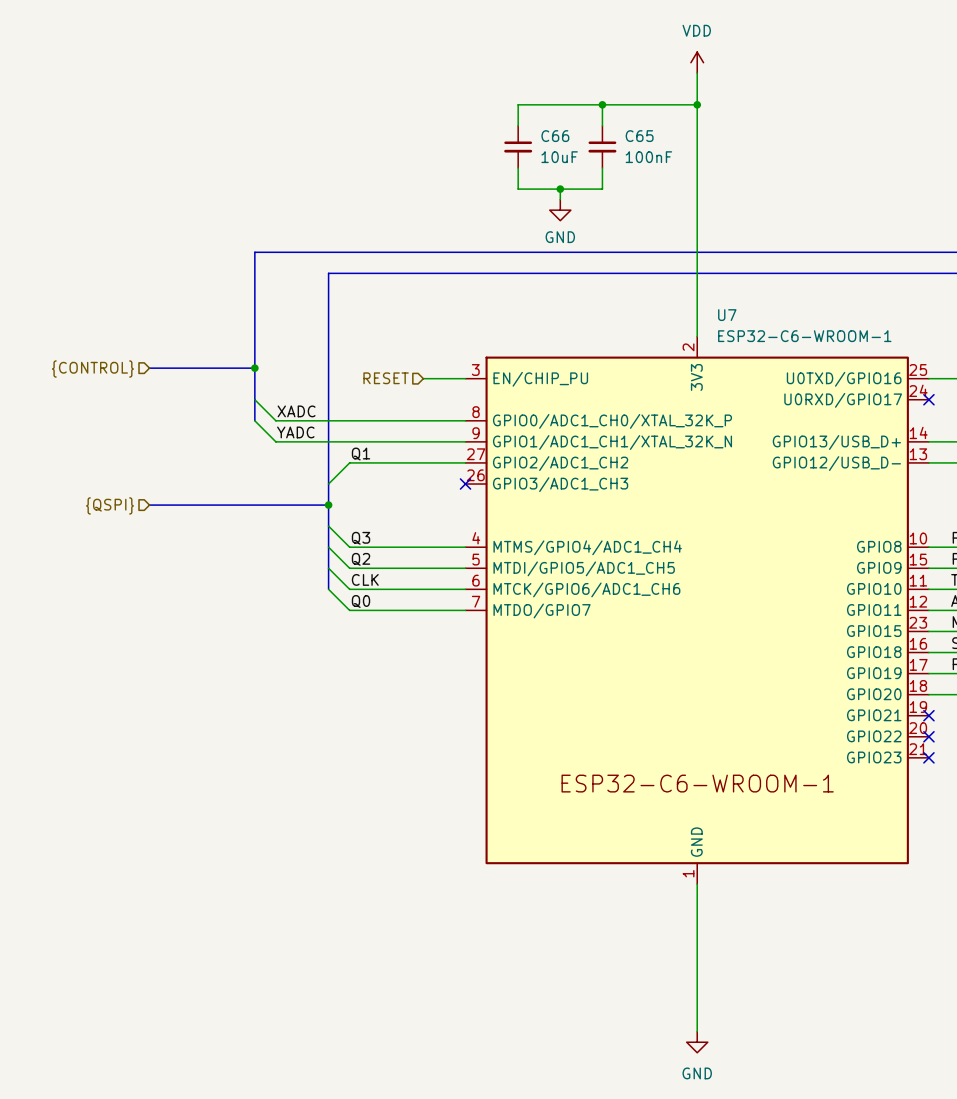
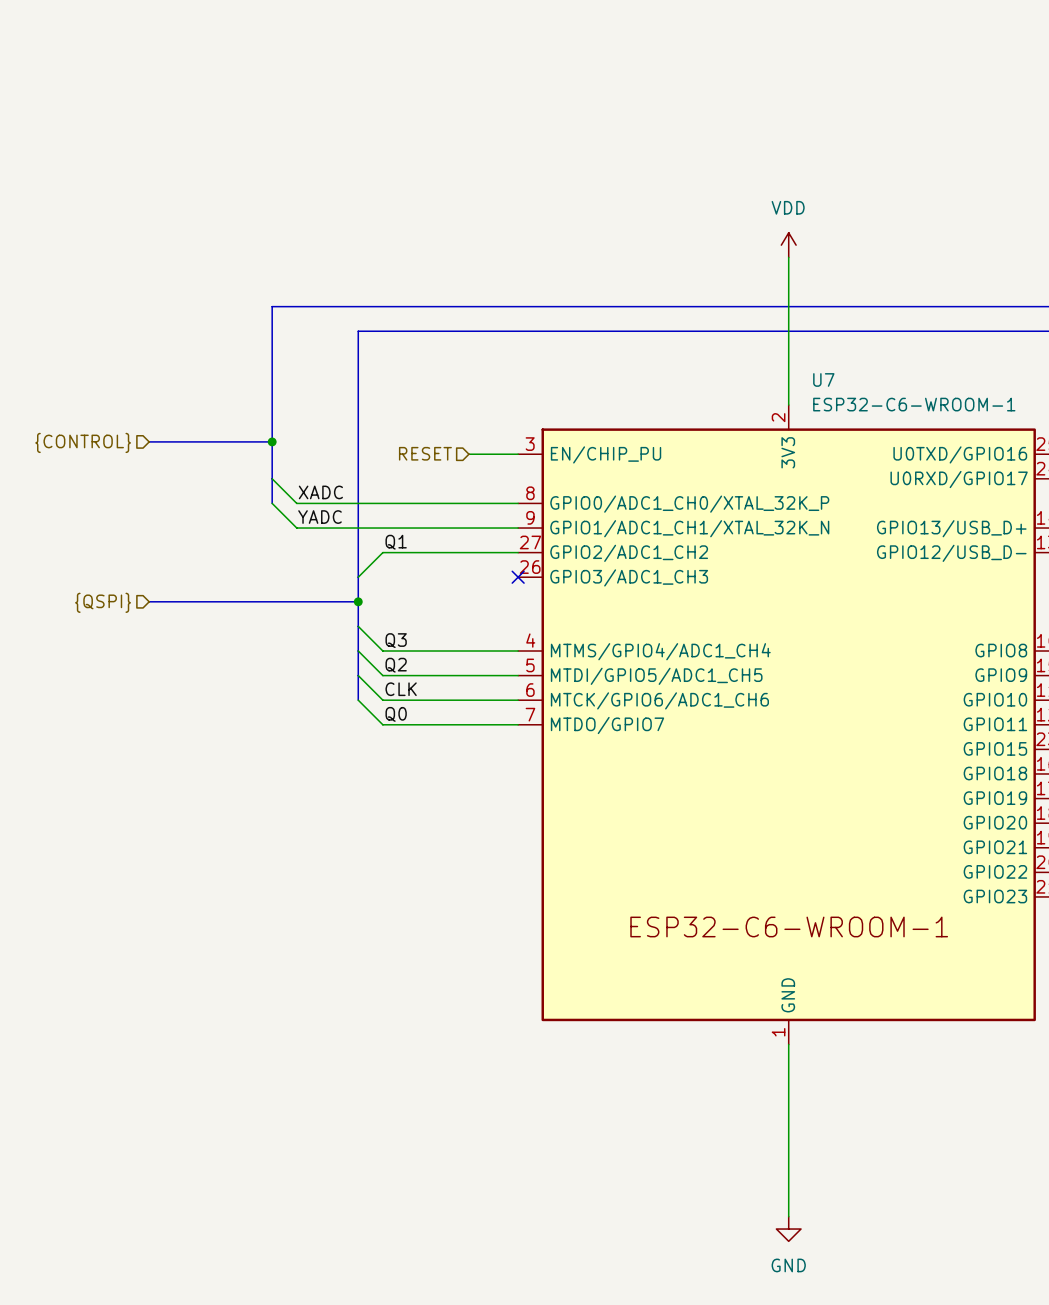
power symbol position: VDD (697, 62) -> VDD (788, 245)
wire: (697, 73) (697, 210) -> none
wire: (602, 104) (602, 125) -> none
junction: (602, 104) -> none
wire: (697, 104) (518, 104) (518, 125) -> none
junction: (697, 104) -> none
C66: 10uF (518, 146) -> none
C65: 100nF (602, 146) -> none
wire: (518, 168) (518, 189) (602, 189) (602, 168) -> none
wire: (560, 189) (560, 199) -> none
junction: (560, 189) -> none
power symbol: GND (560, 210) -> none

